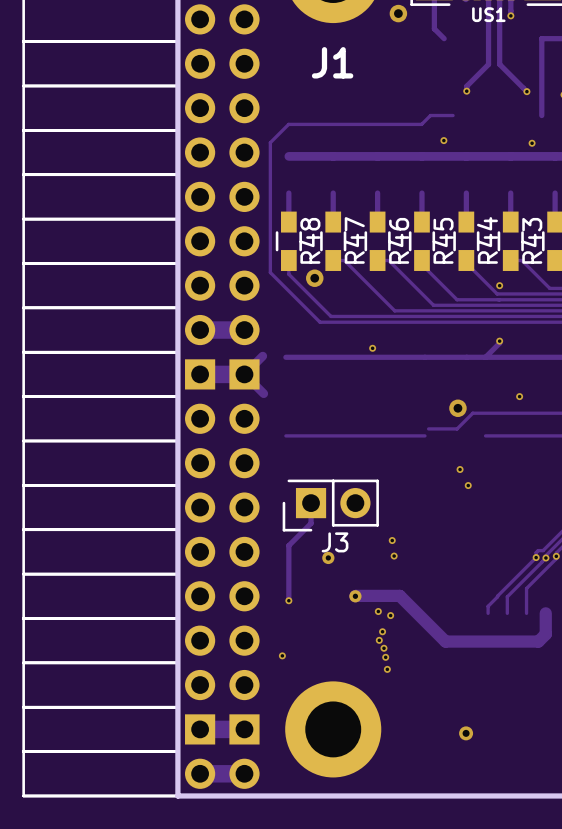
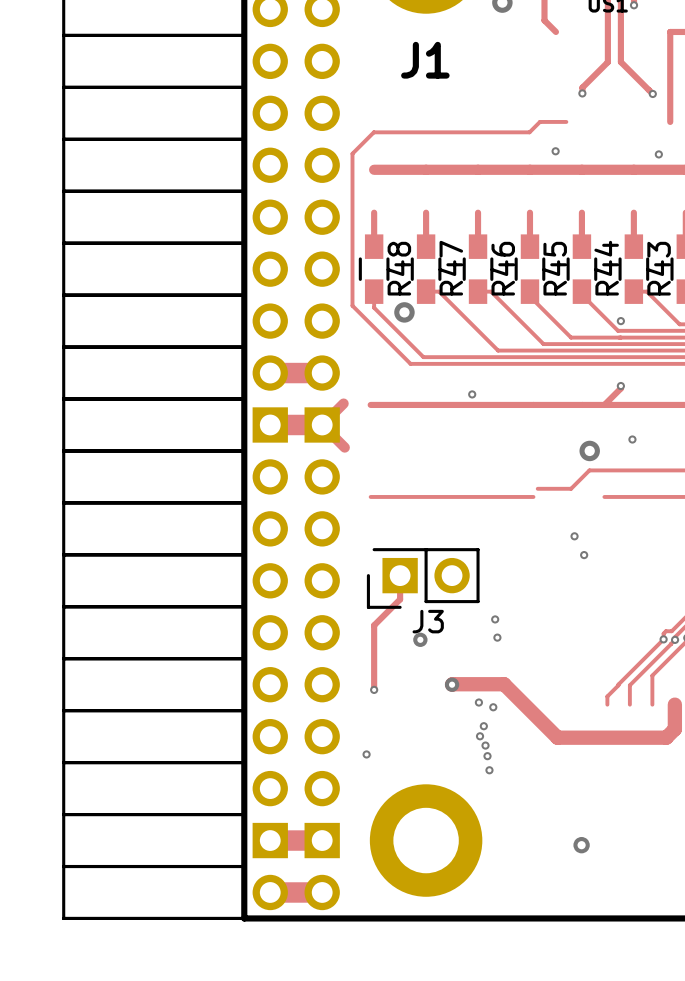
via position: (519, 396) -> (632, 439)
via position: (457, 408) -> (589, 450)

